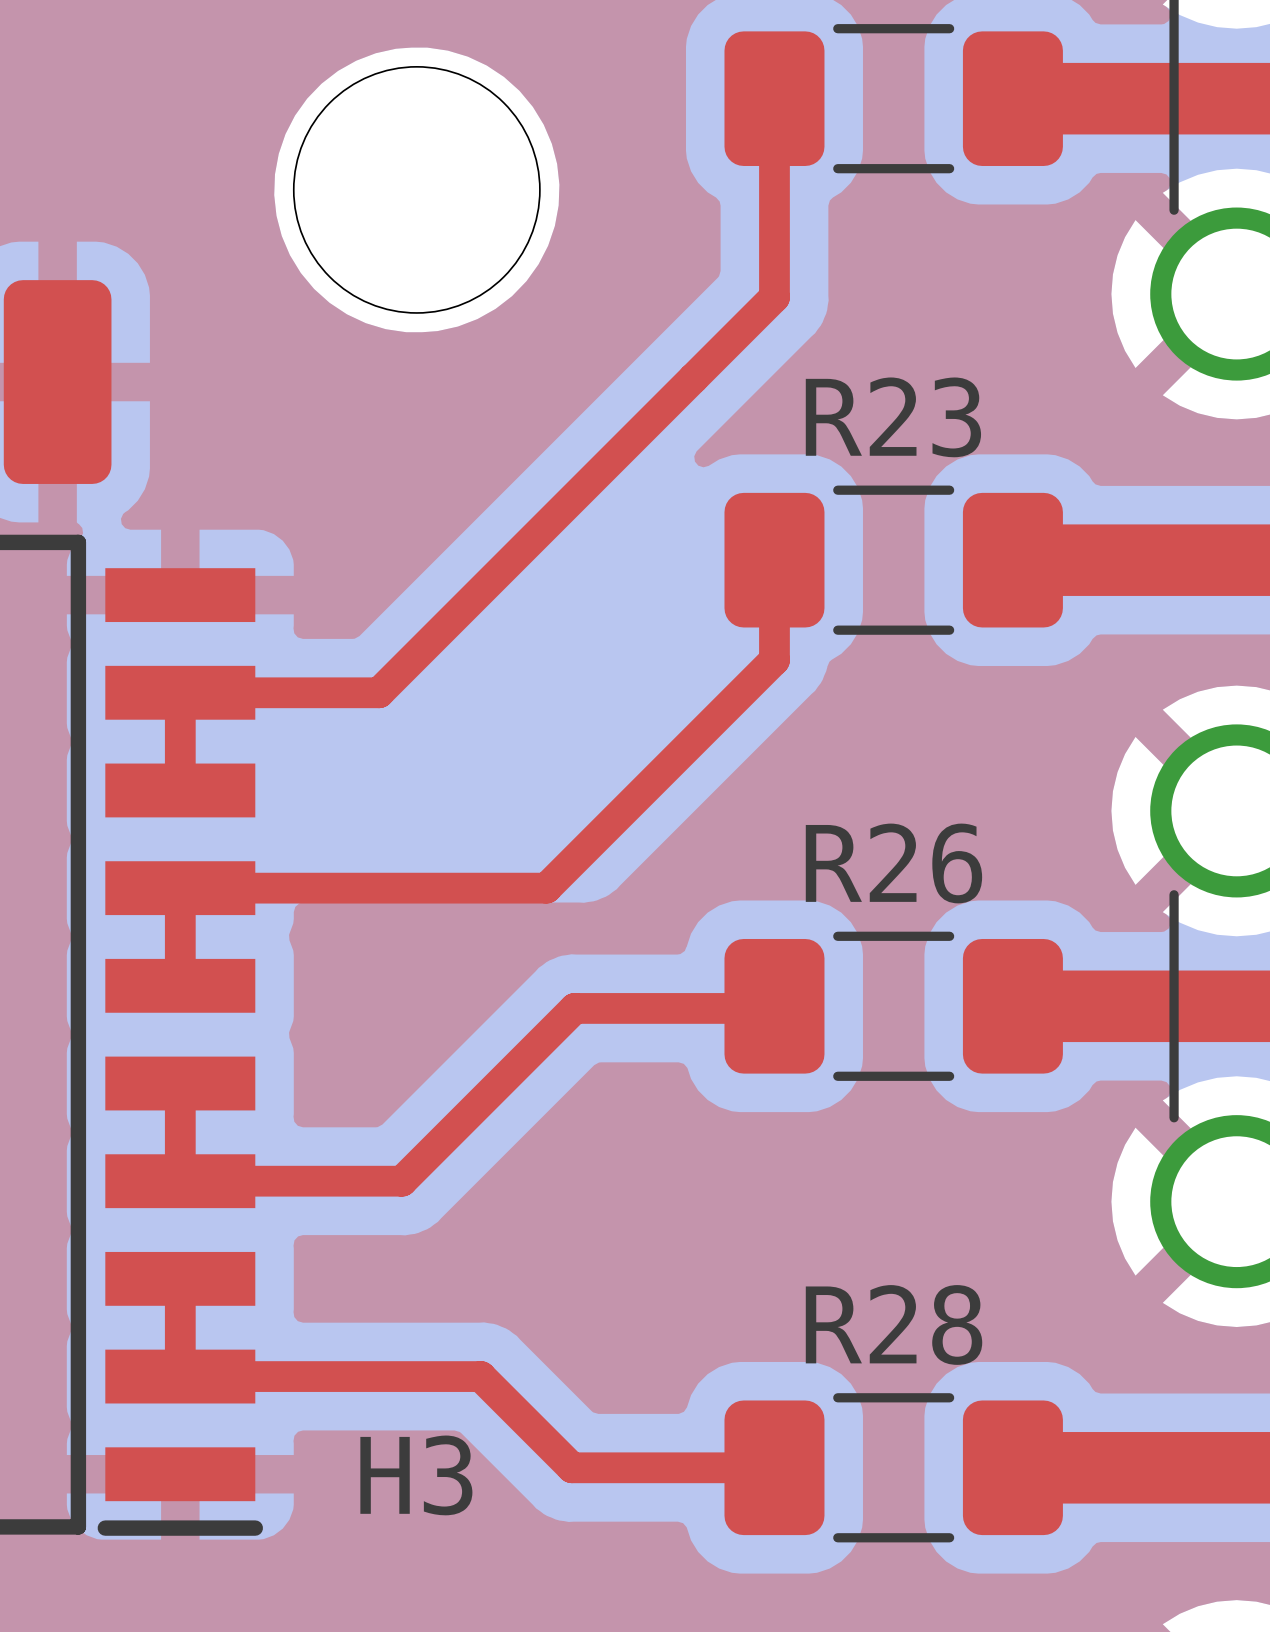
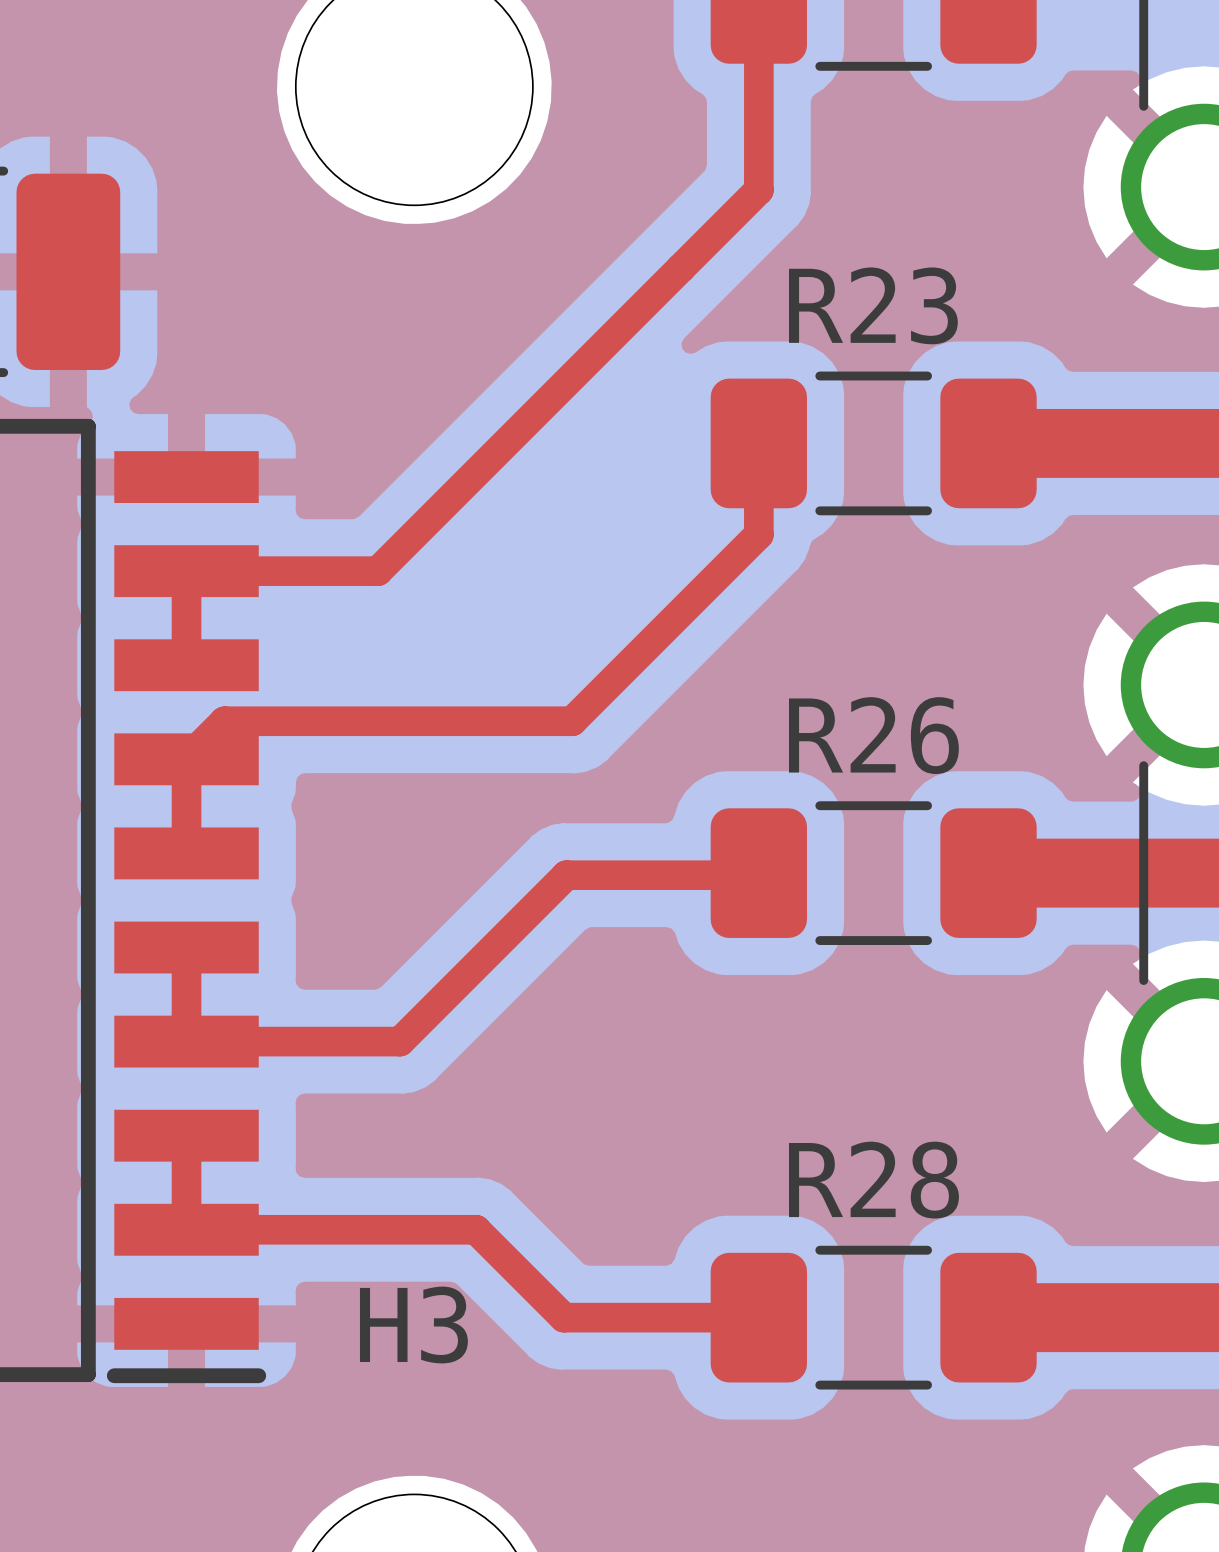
top track: (774, 654) (774, 660) (546, 888) (180, 888) -> (758, 534) (572, 721) (224, 721) (186, 759)

